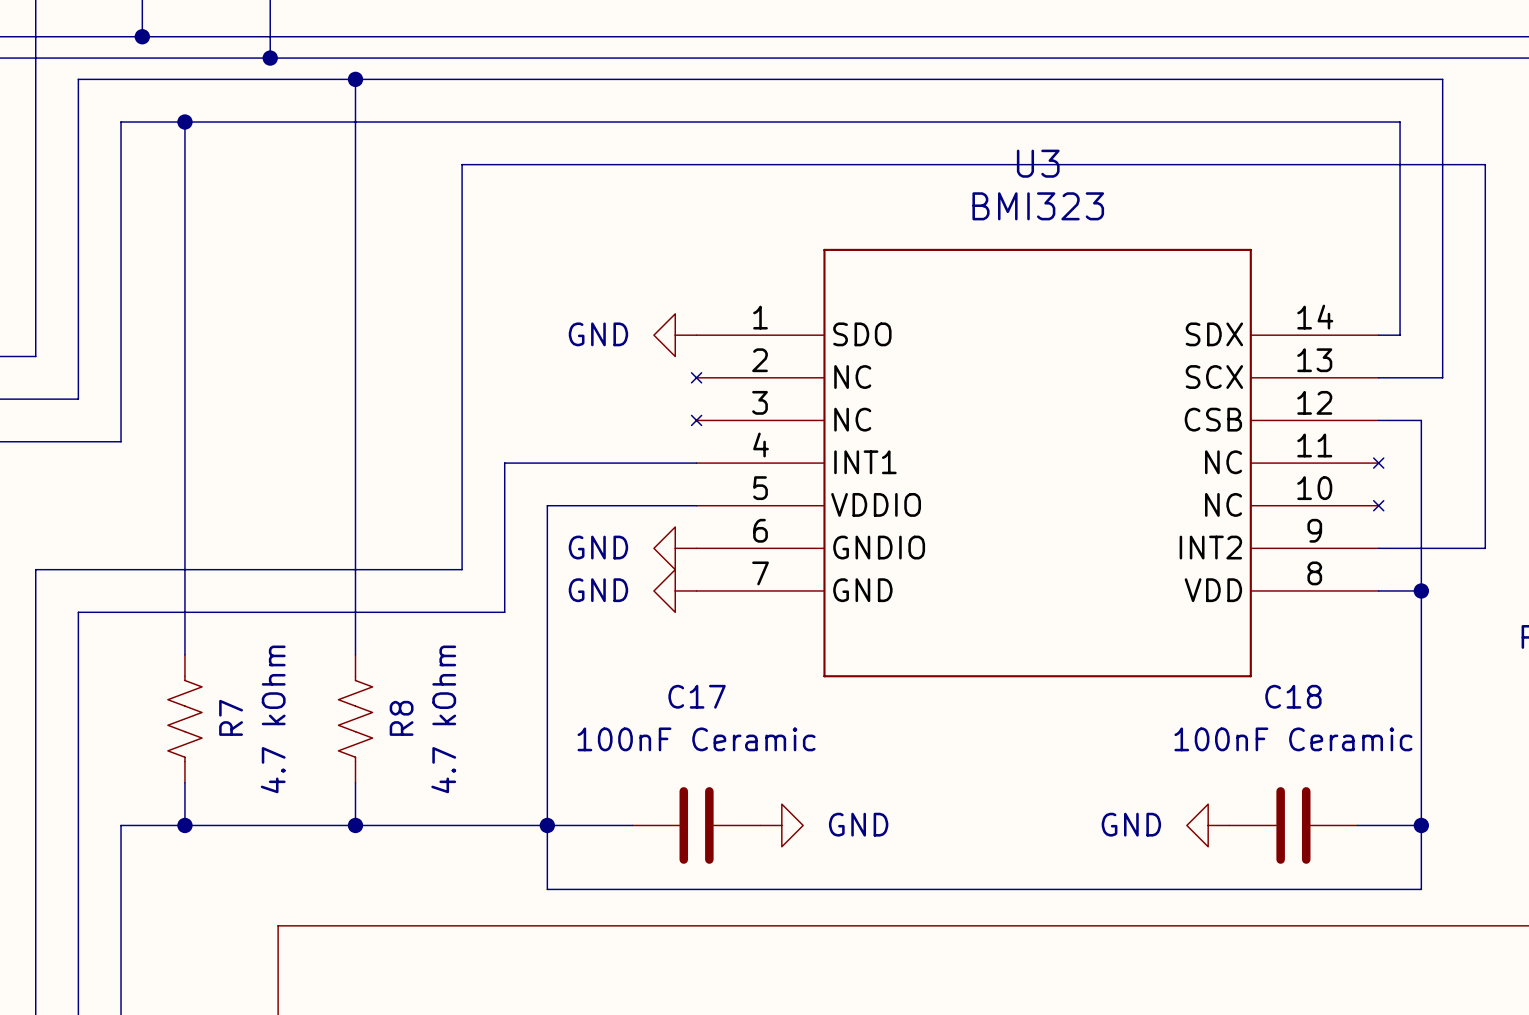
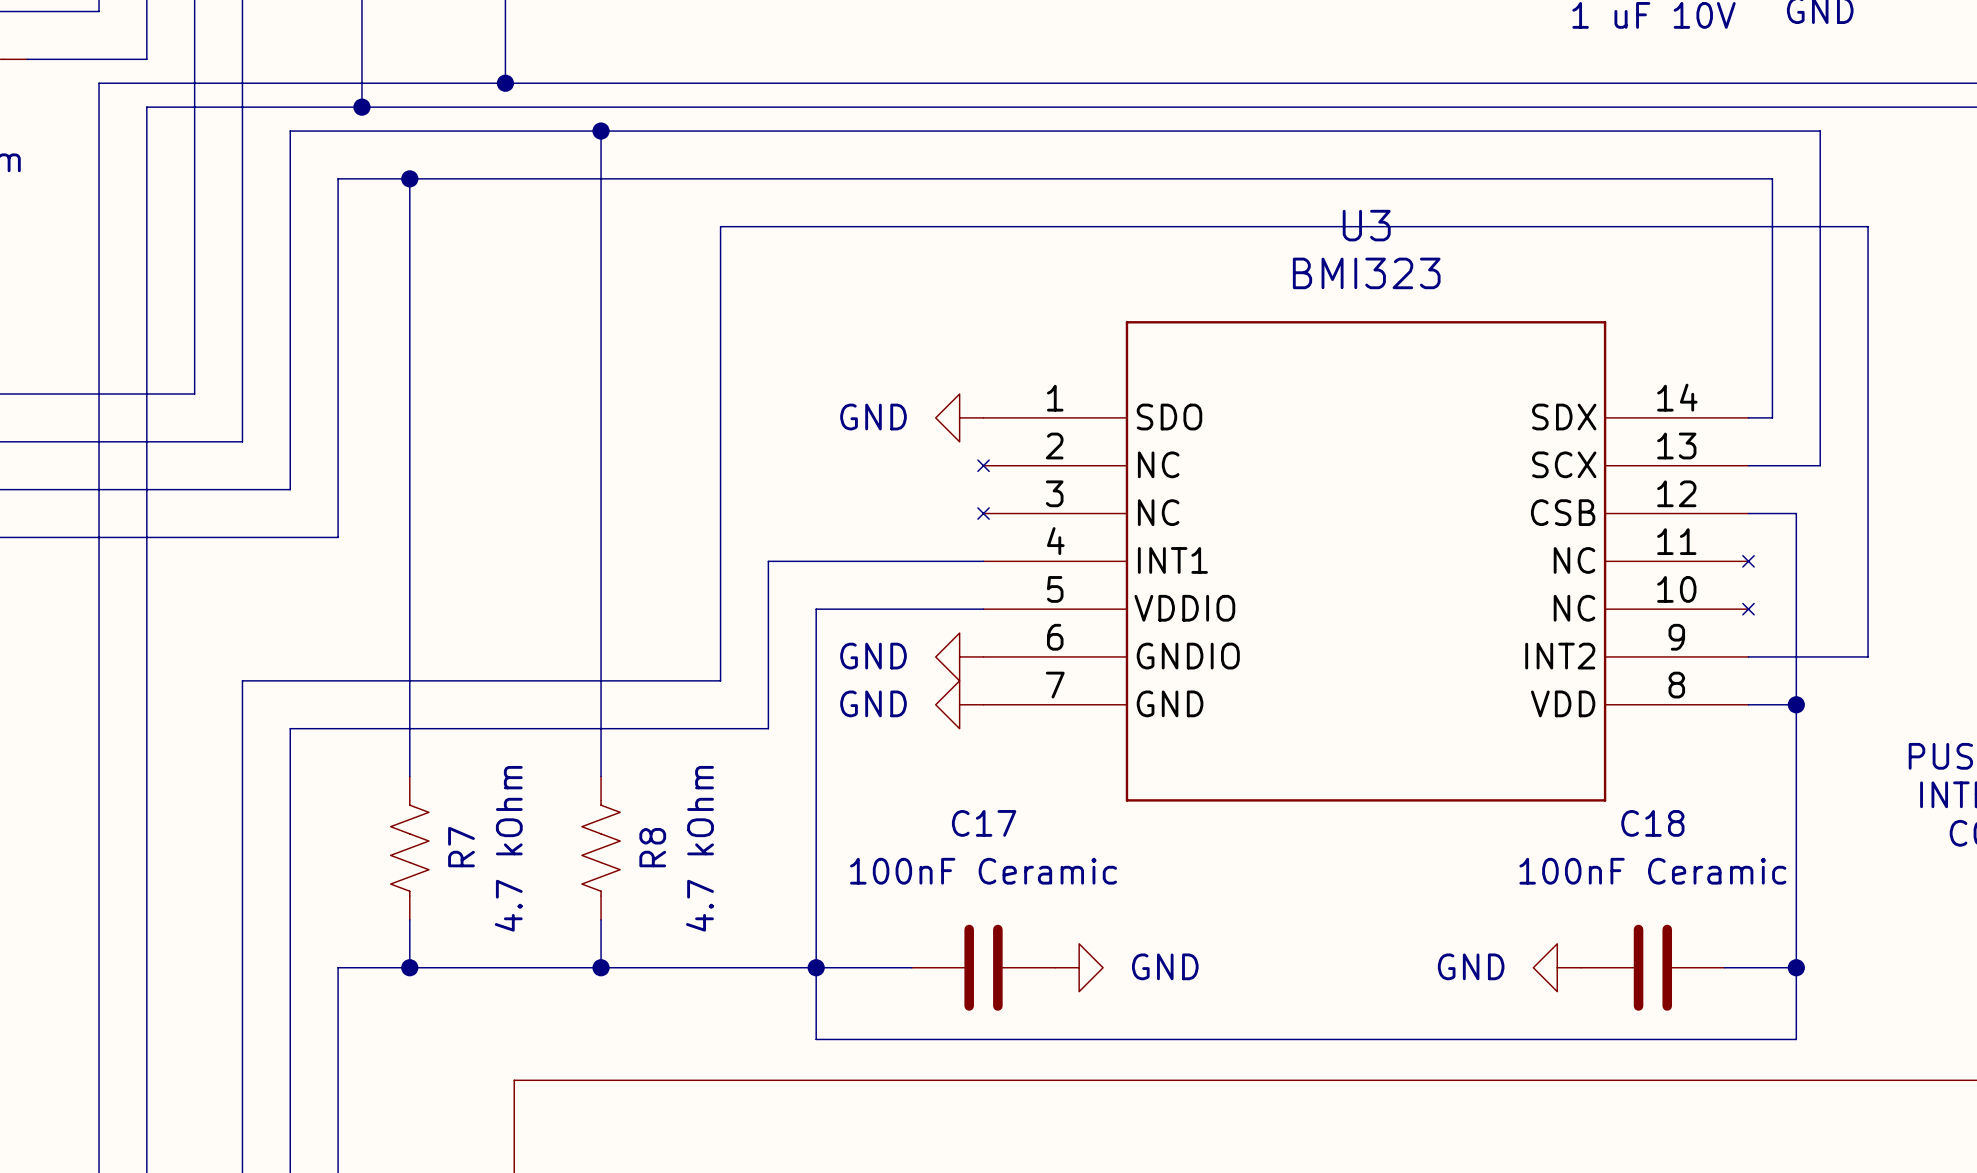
junction position: (142, 36) -> (361, 107)
wire: (270, 36) (270, 58) -> (361, 83) (361, 107)
junction position: (270, 58) -> (505, 83)

